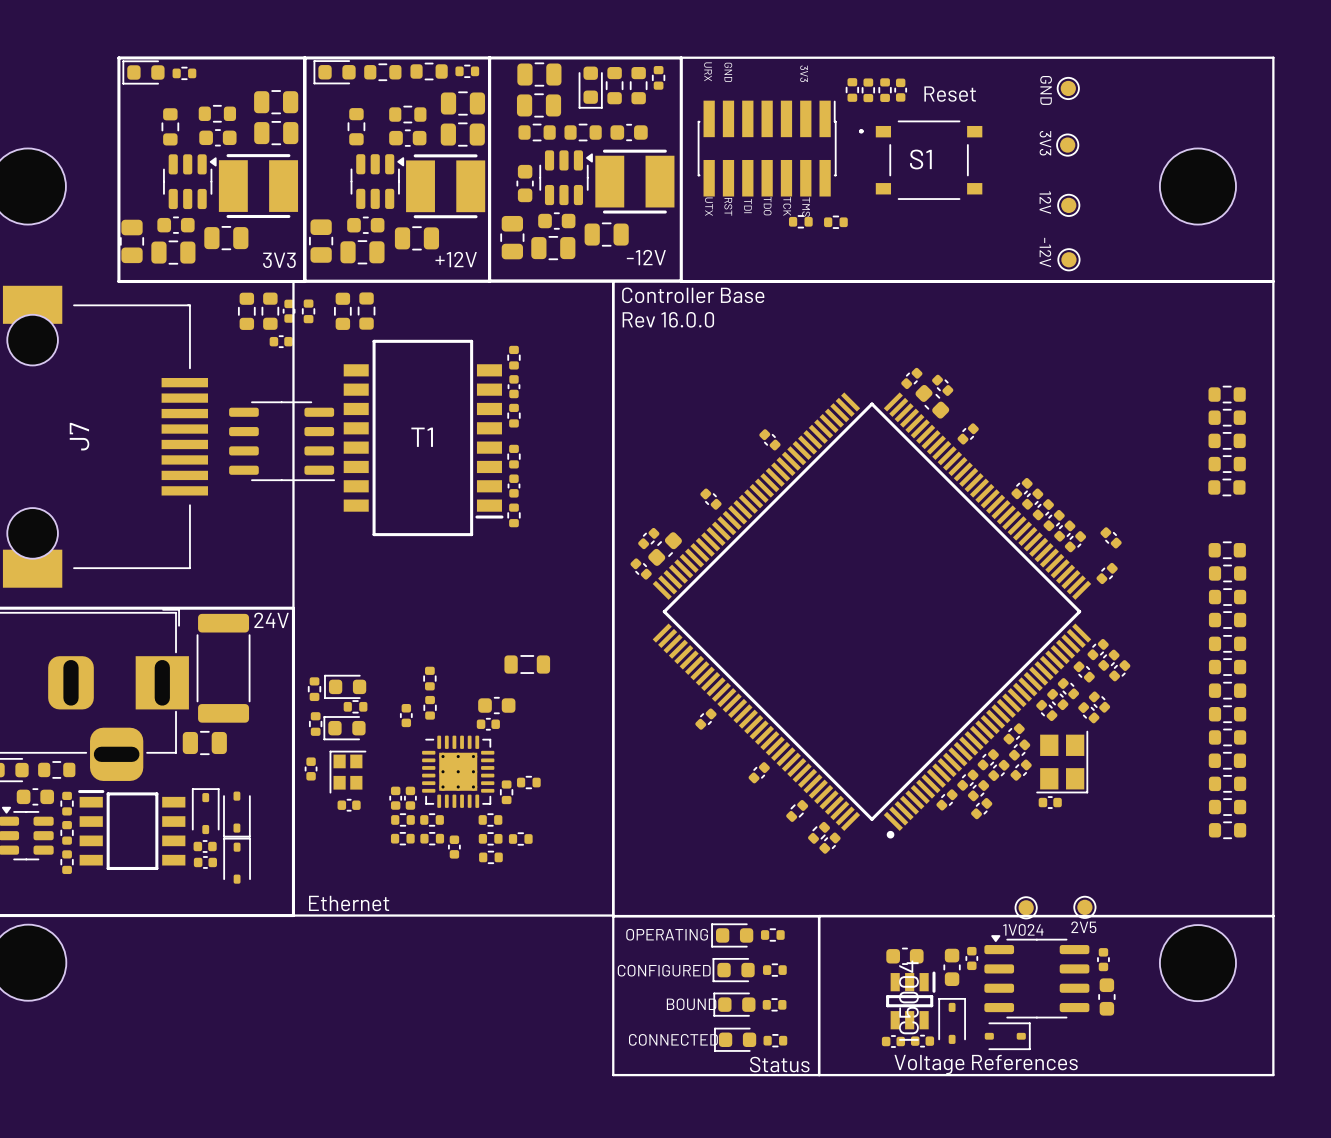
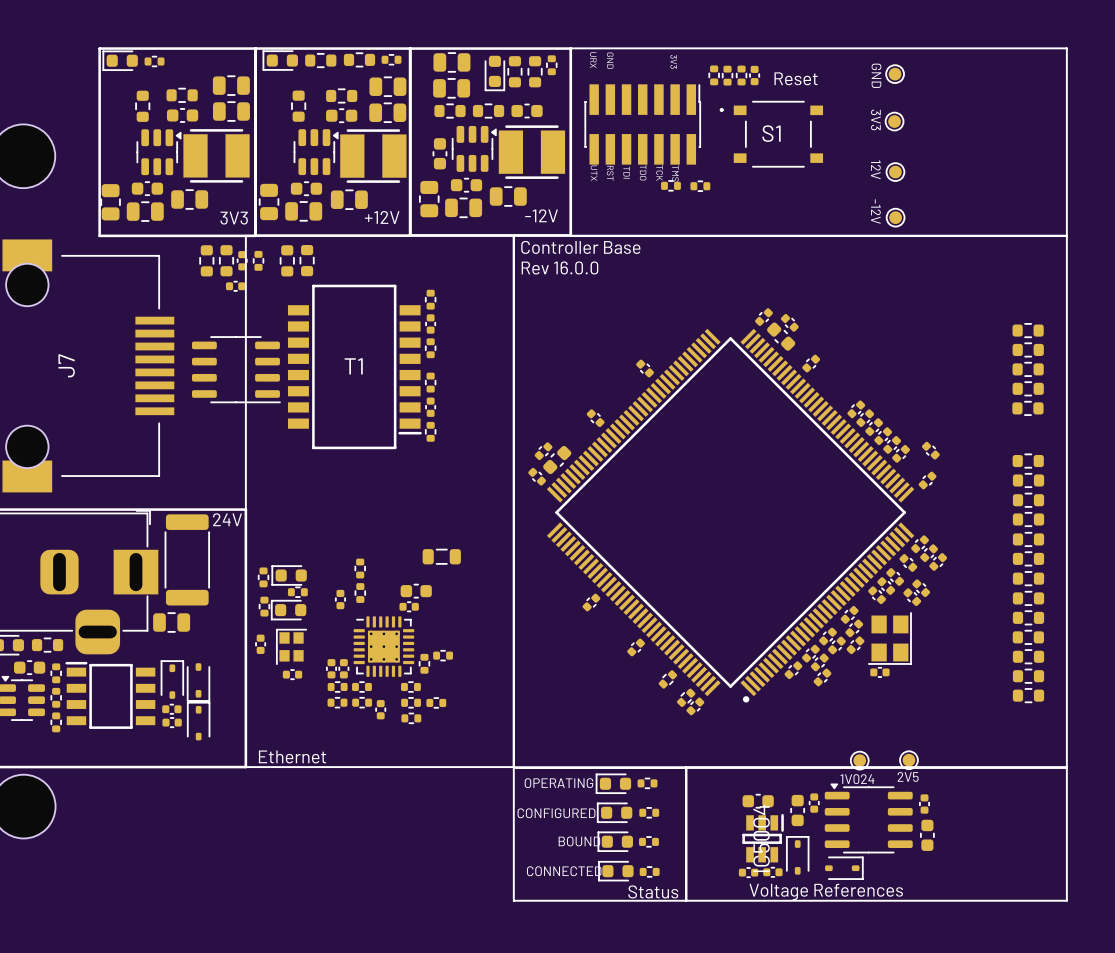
part: (1197, 186) -> none
part: (1197, 963) -> none

